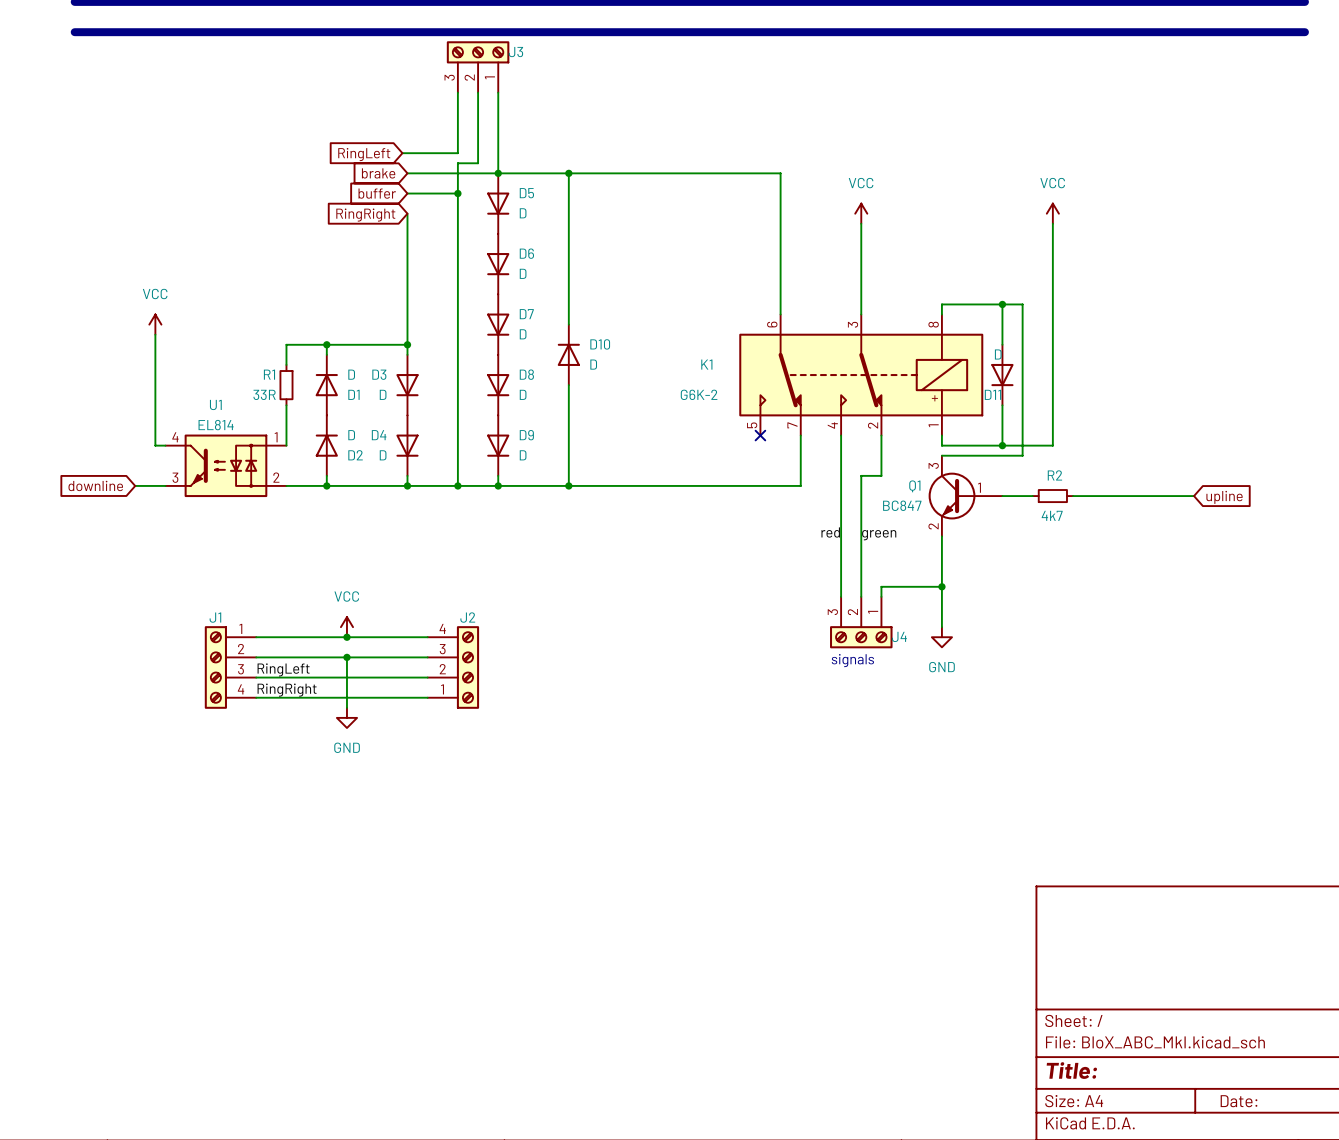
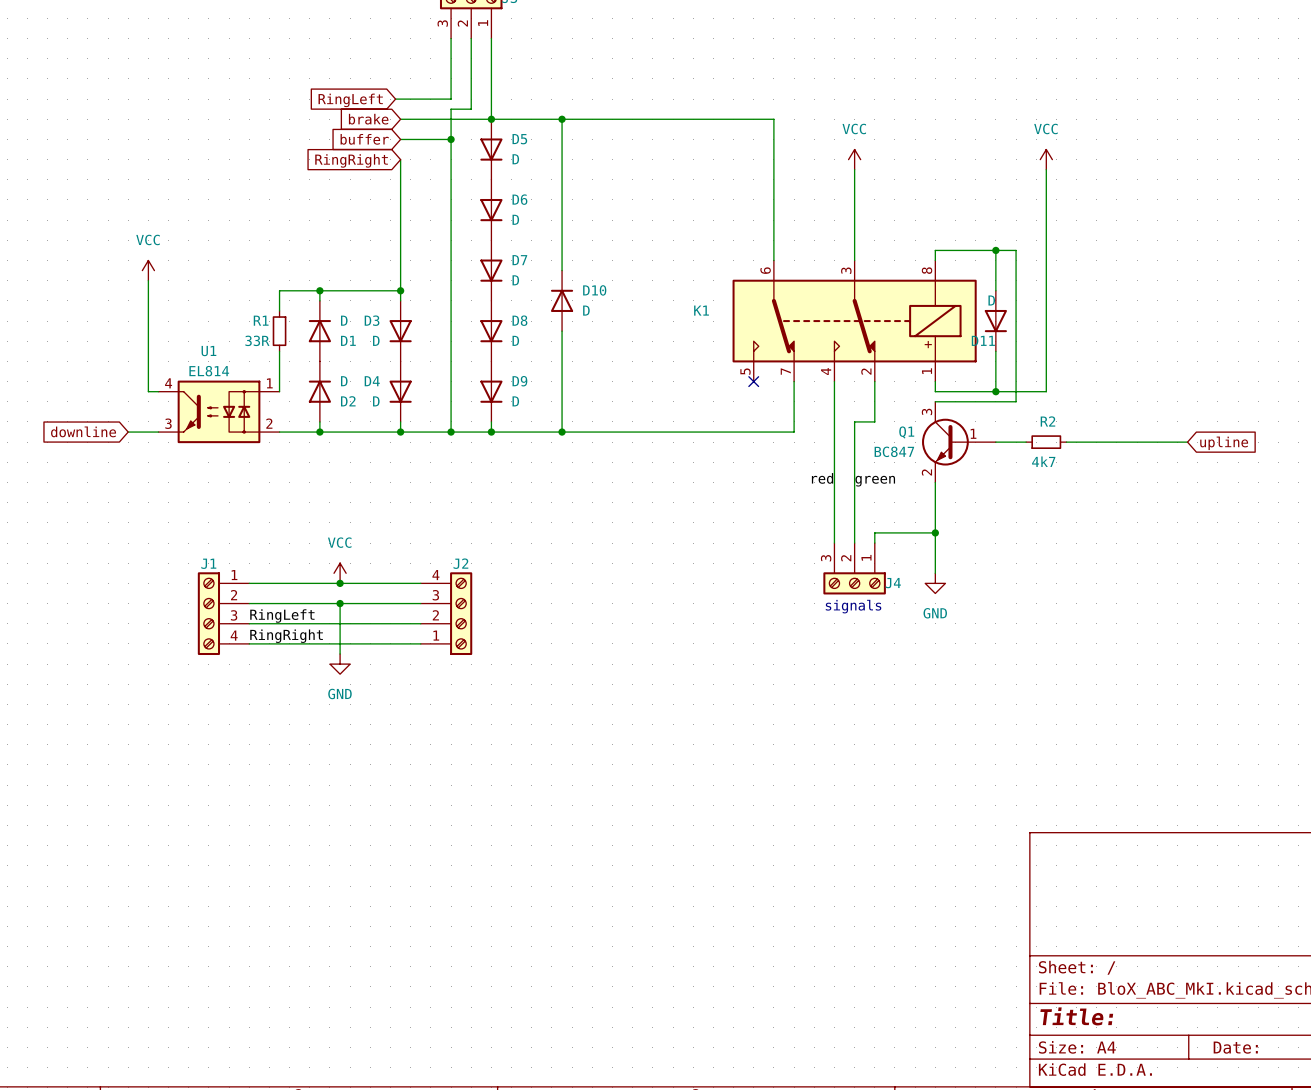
K1 value: G6K-2 (699, 394) -> none

